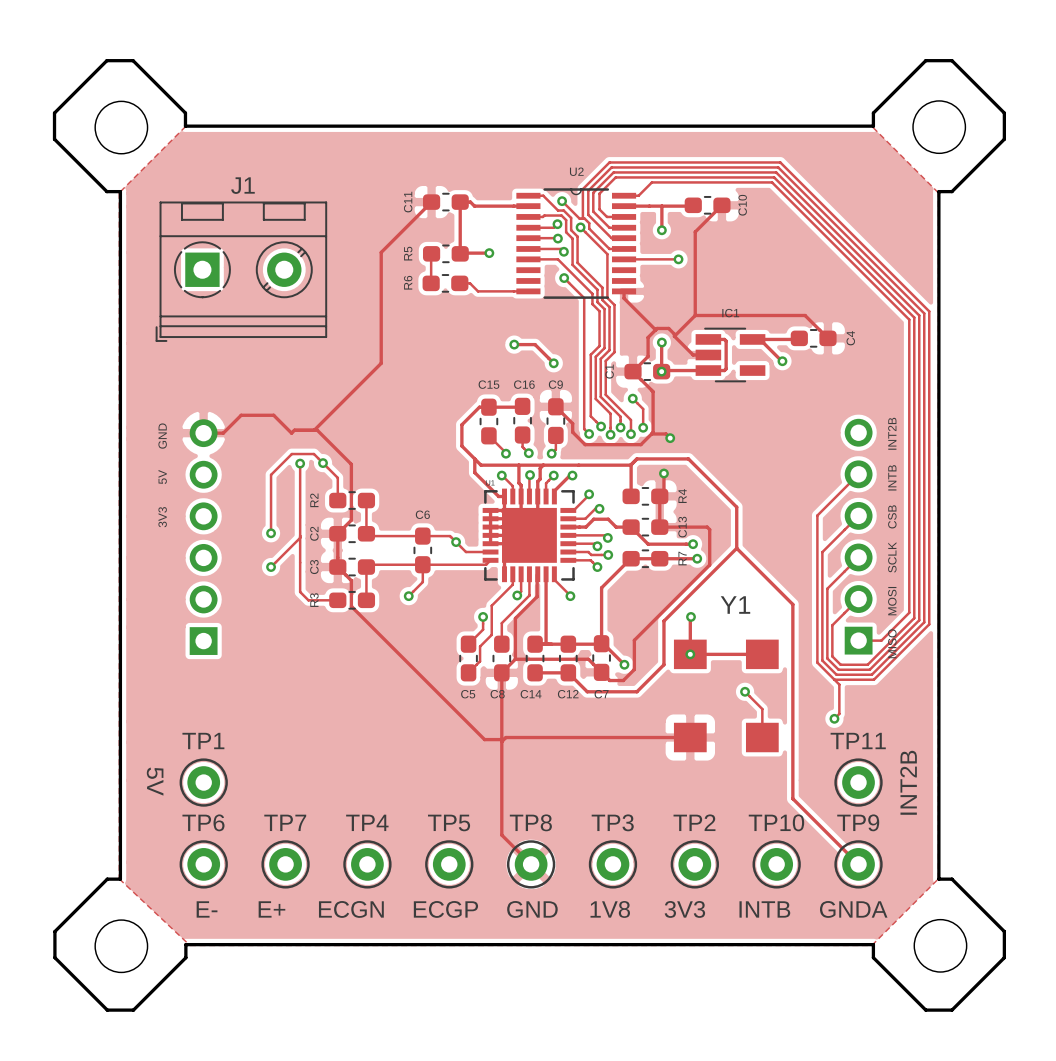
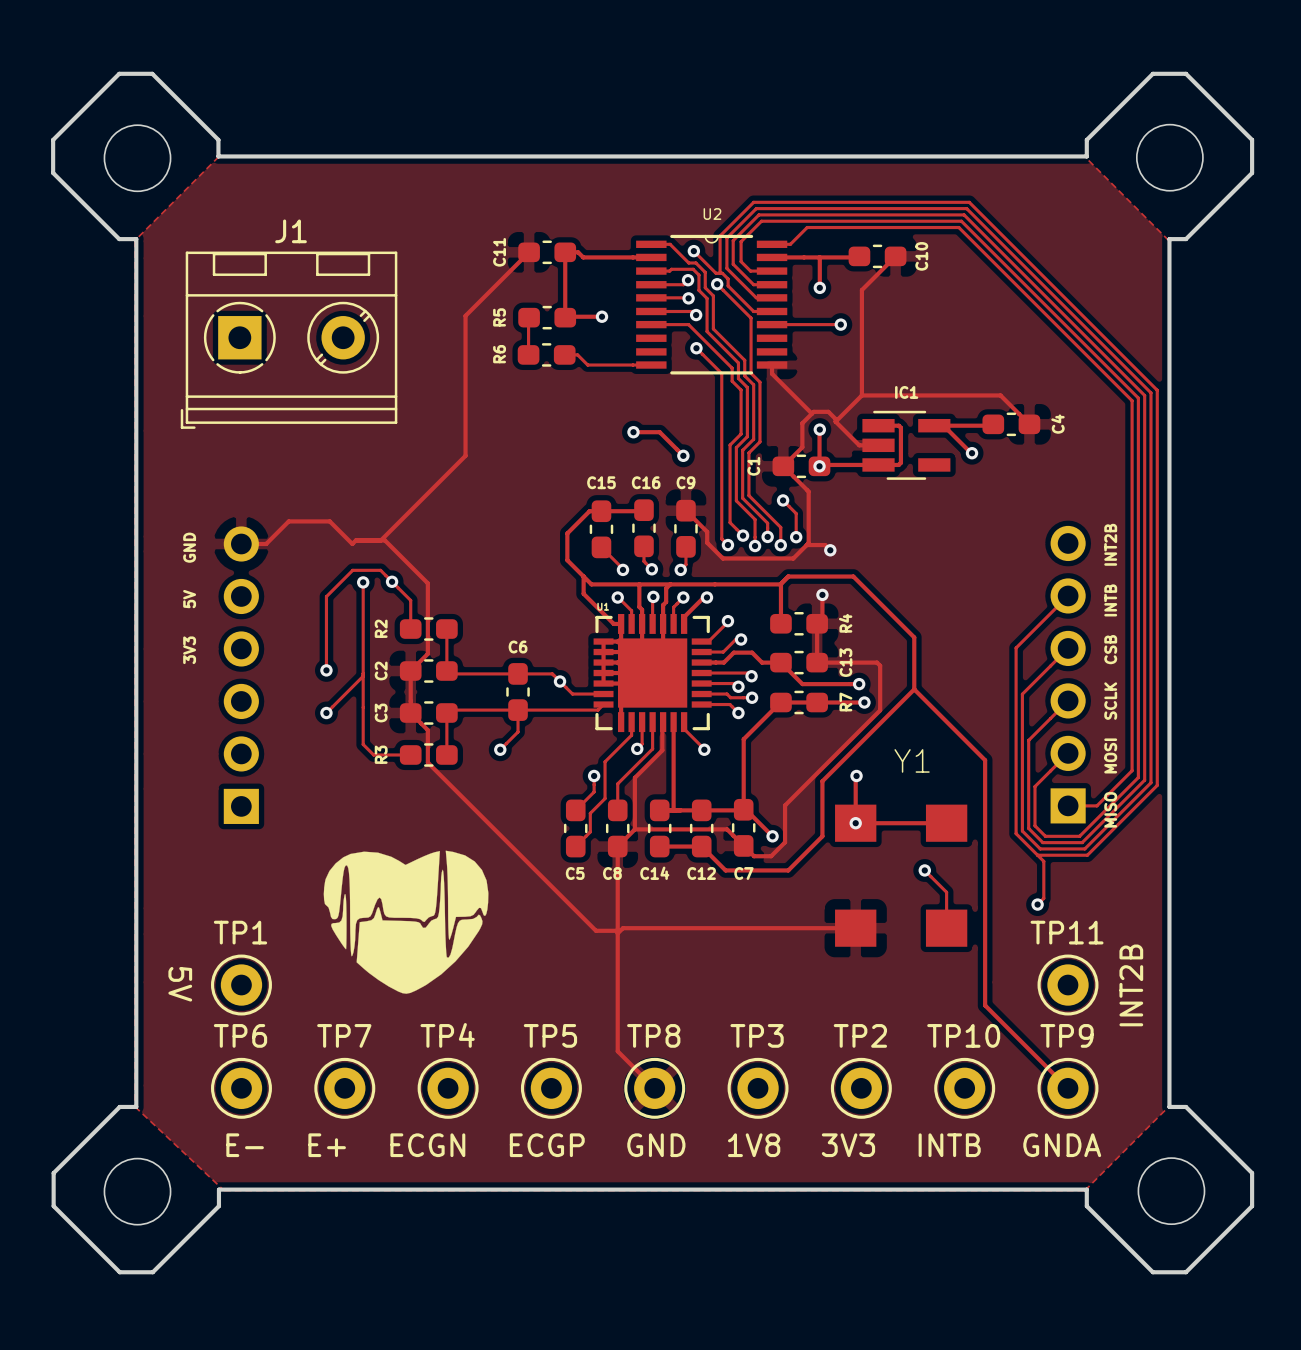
drawing: none -> [323, 850, 489, 994]

